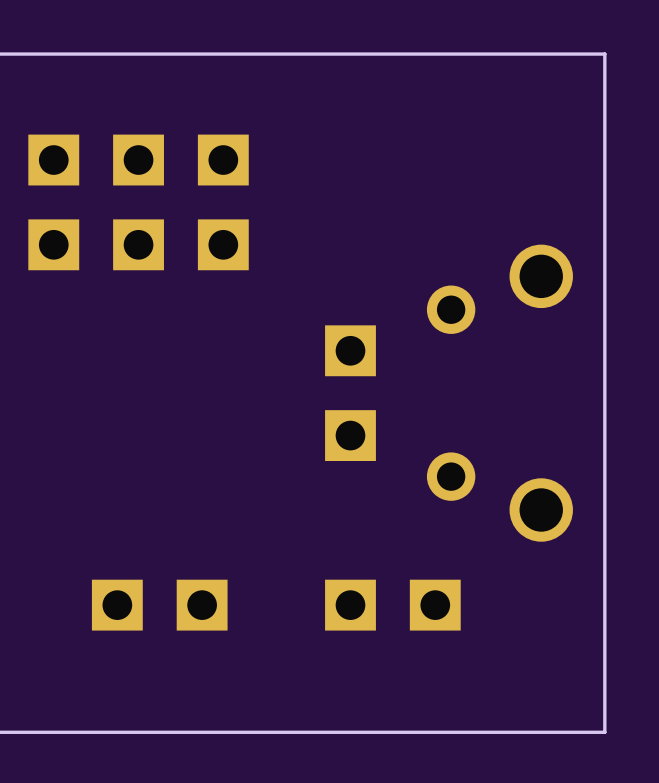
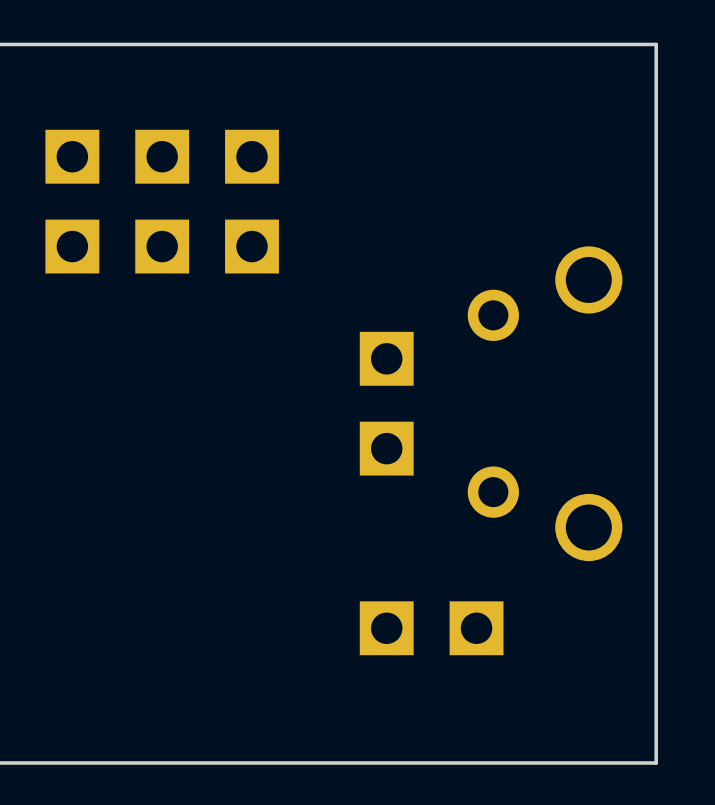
part: (117, 605) -> none
part: (202, 605) -> none

